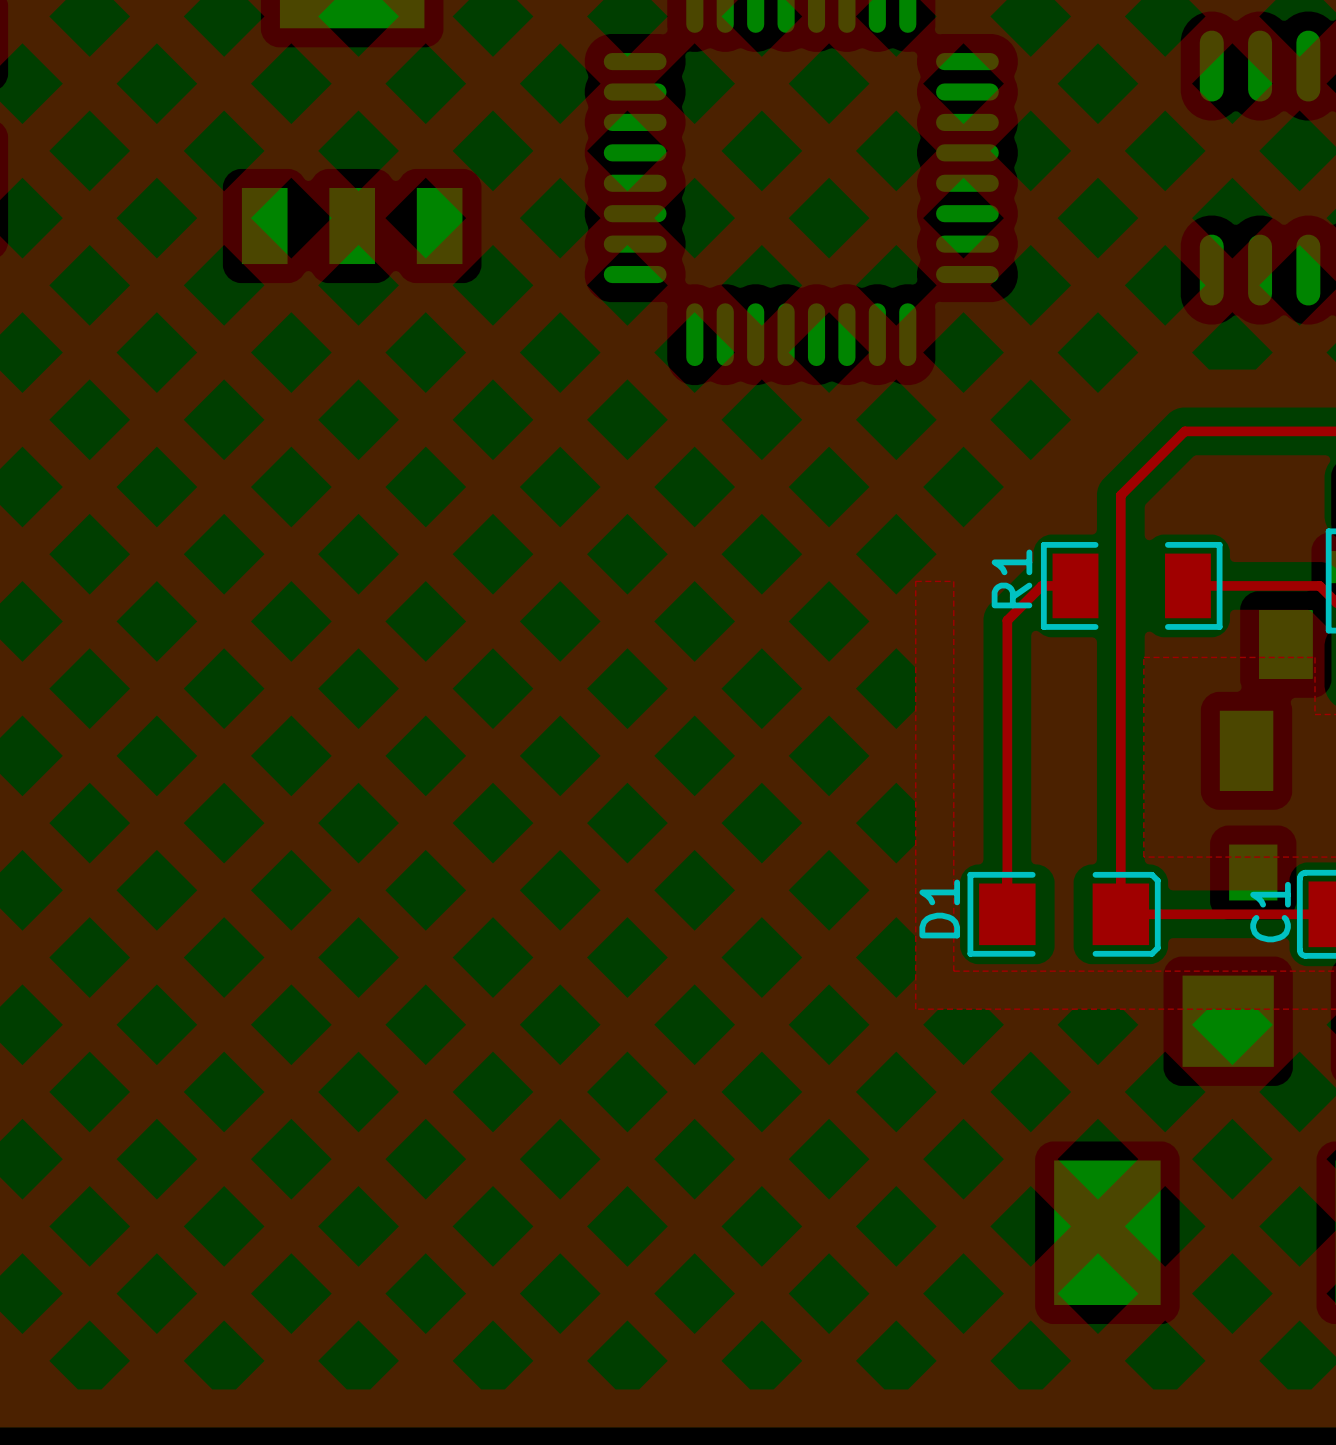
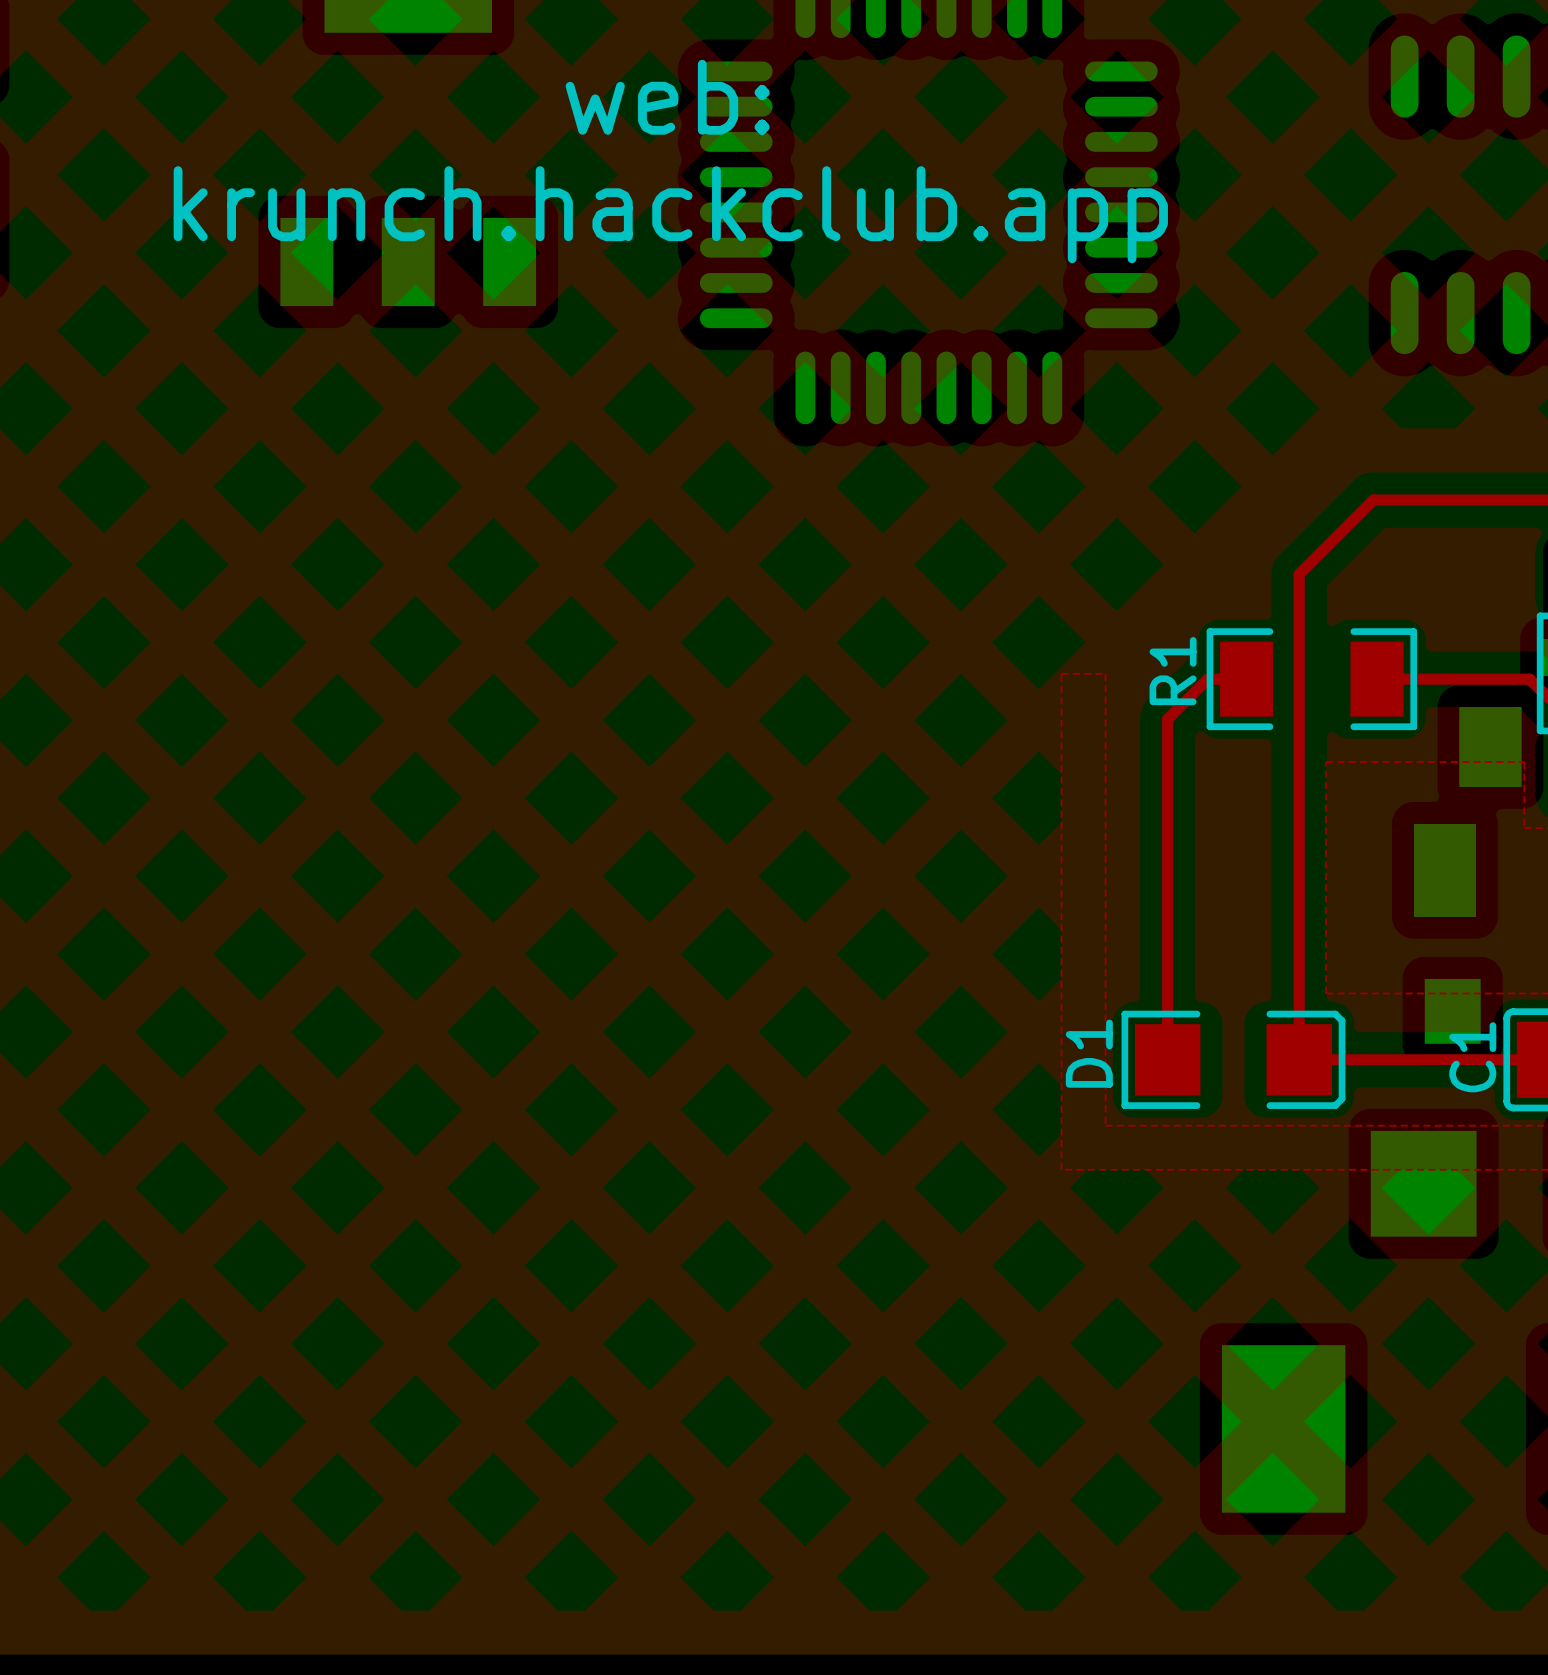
text: none -> web: (667, 97)
text: none -> krunch.hackclub.app (670, 214)

